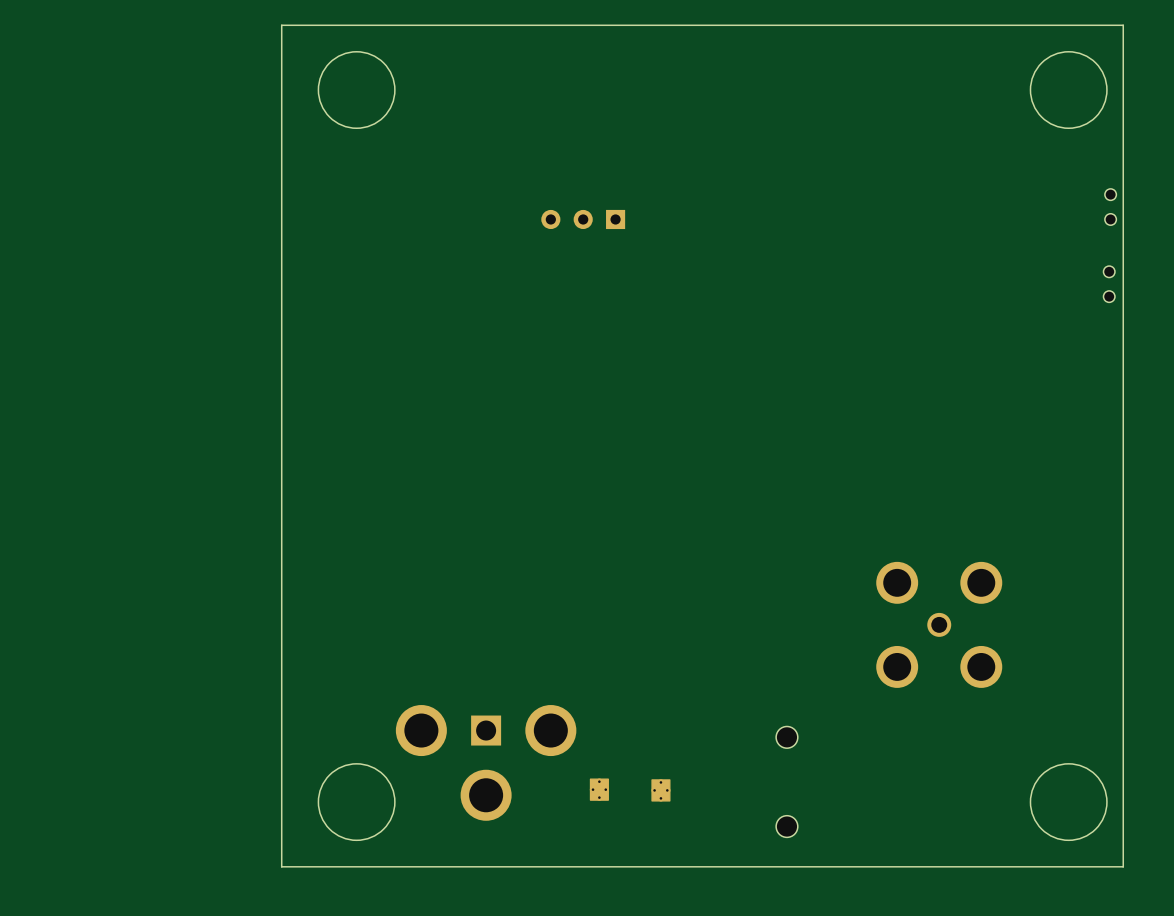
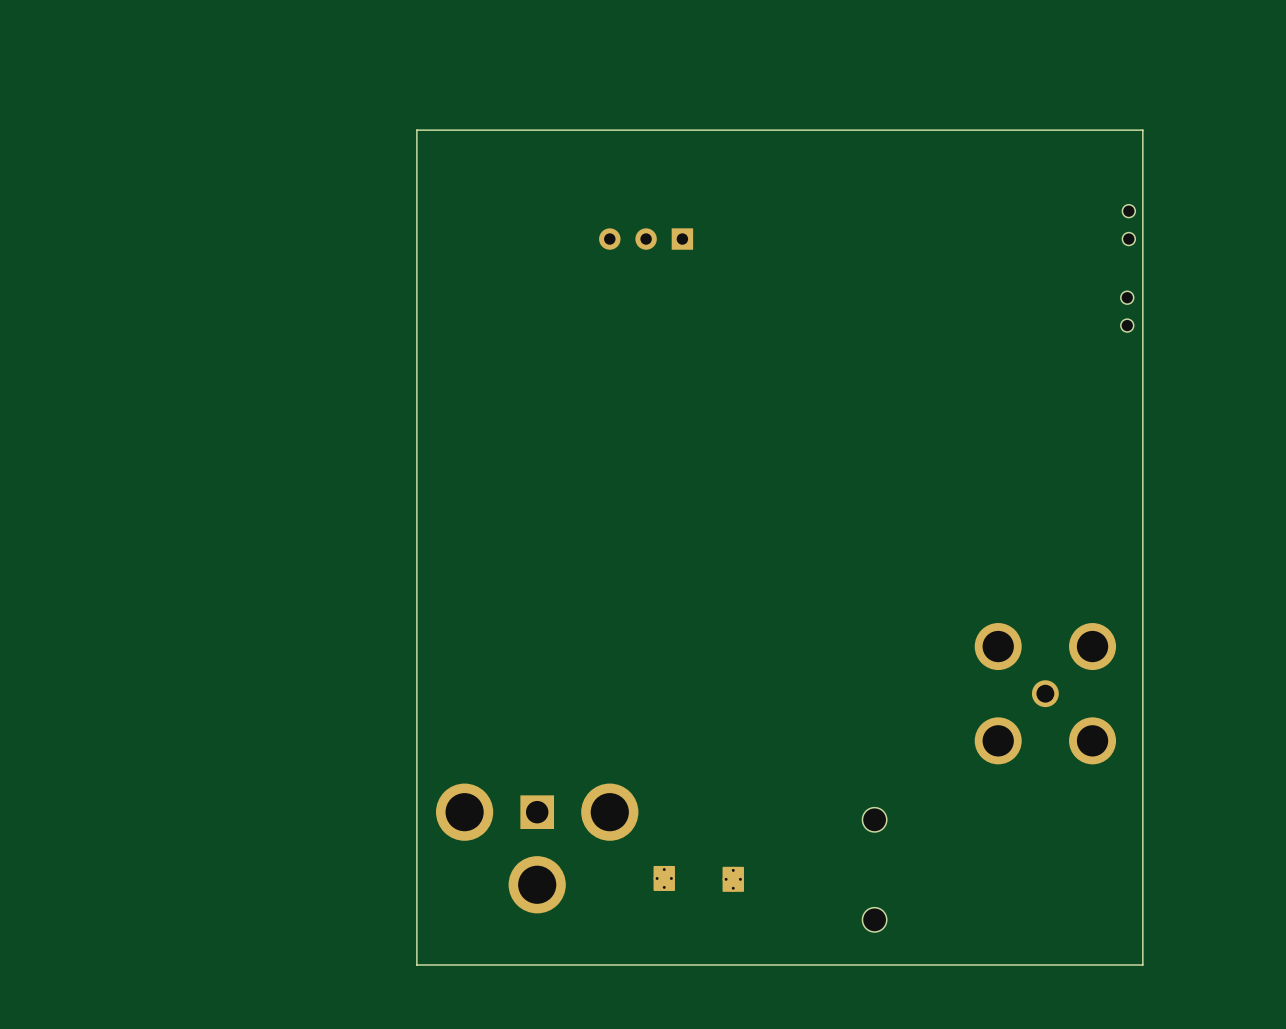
round board edge: [317, 51, 396, 129] -> none
round board edge: [1029, 51, 1108, 129] -> none
part: none -> (1128, 225)
part: (1110, 207) -> none
part: none -> (1127, 311)
part: (1109, 284) -> none
round board edge: [317, 763, 396, 841] -> none
round board edge: [1029, 763, 1108, 841] -> none
board edge: (1026, 866) (1123, 866) (1123, 25) (281, 25) (281, 866) (378, 866) -> (1142, 964) (1142, 130) (416, 130) (416, 964)

